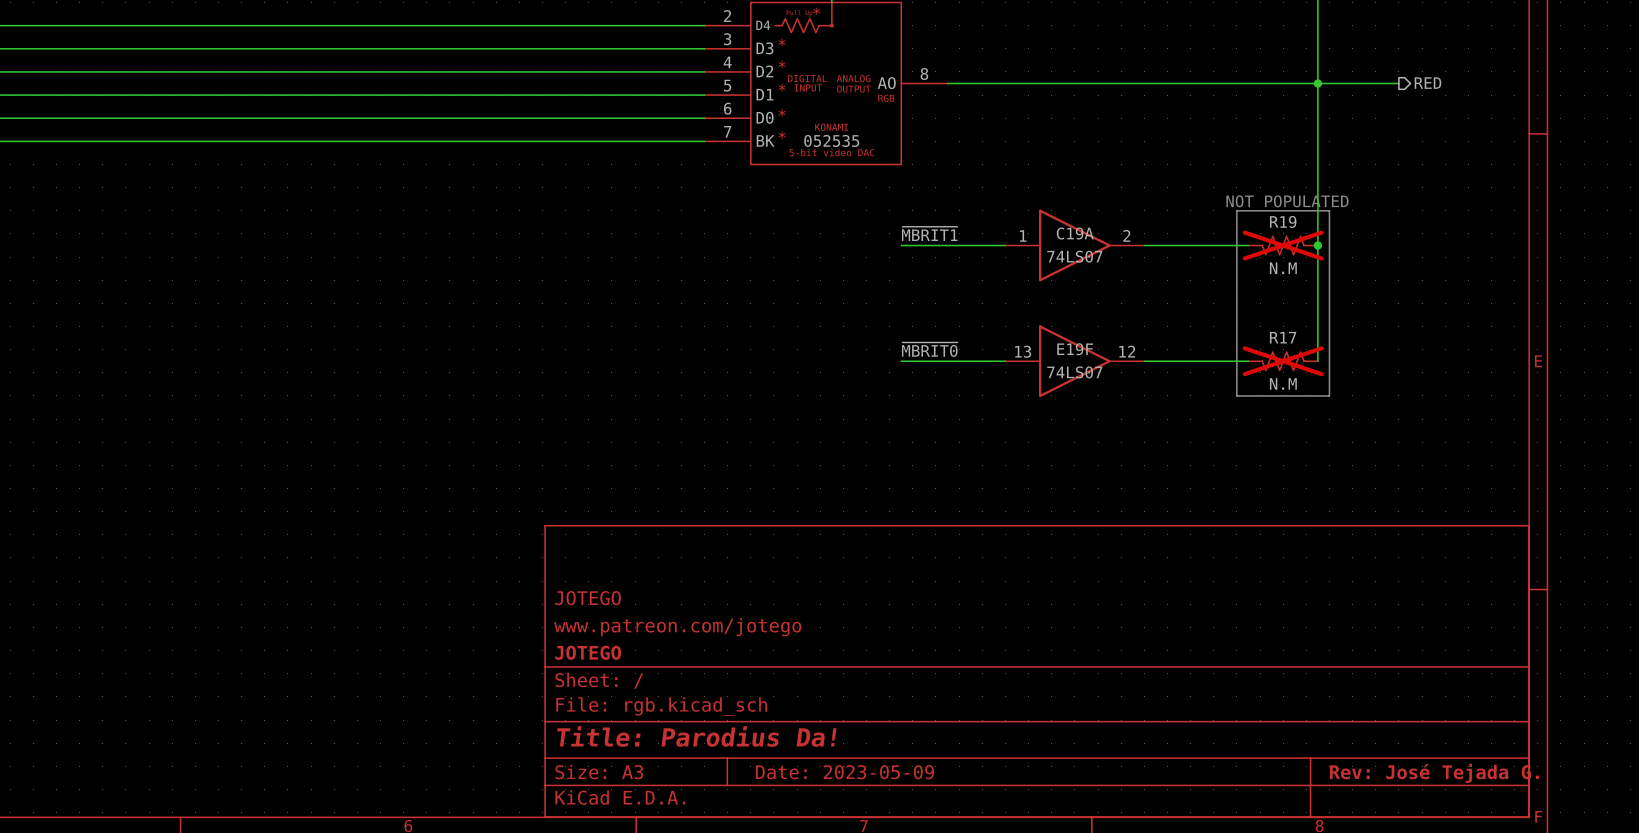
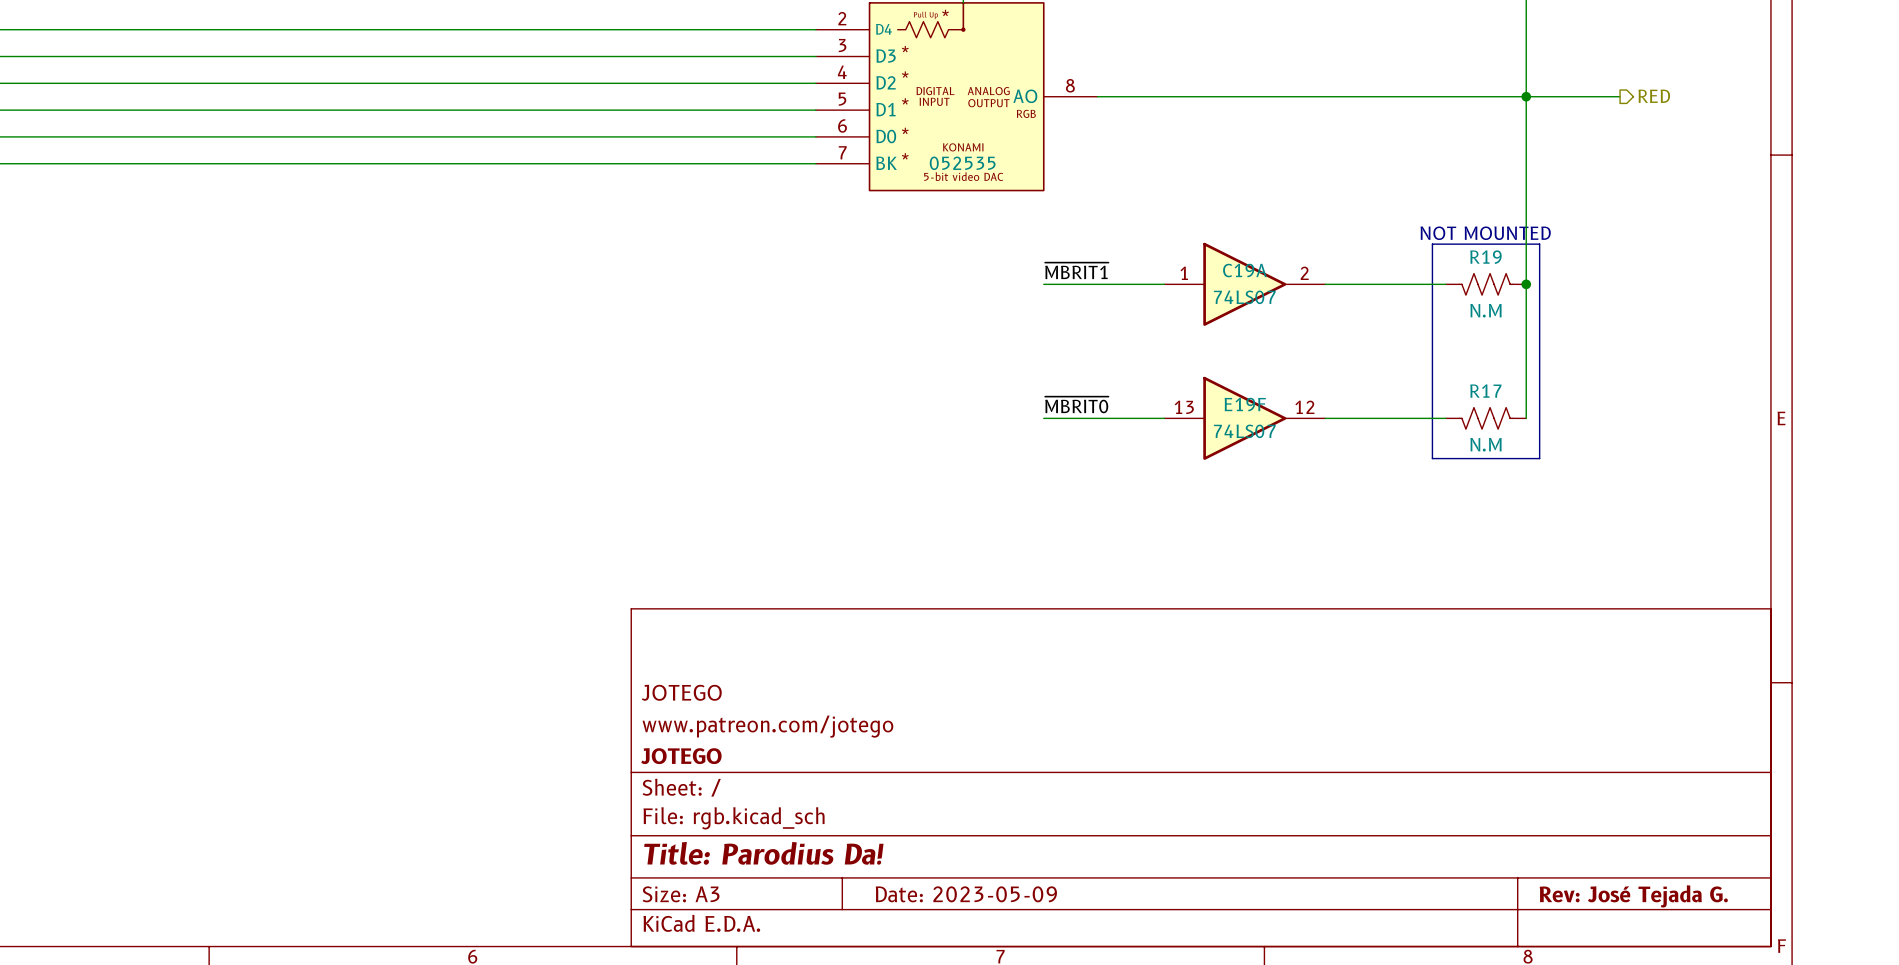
text: NOT POPULATED (1287, 201) -> NOT MOUNTED (1485, 233)
R19 do-not-place cross: (1283, 245) -> none
R17 do-not-place cross: (1283, 361) -> none

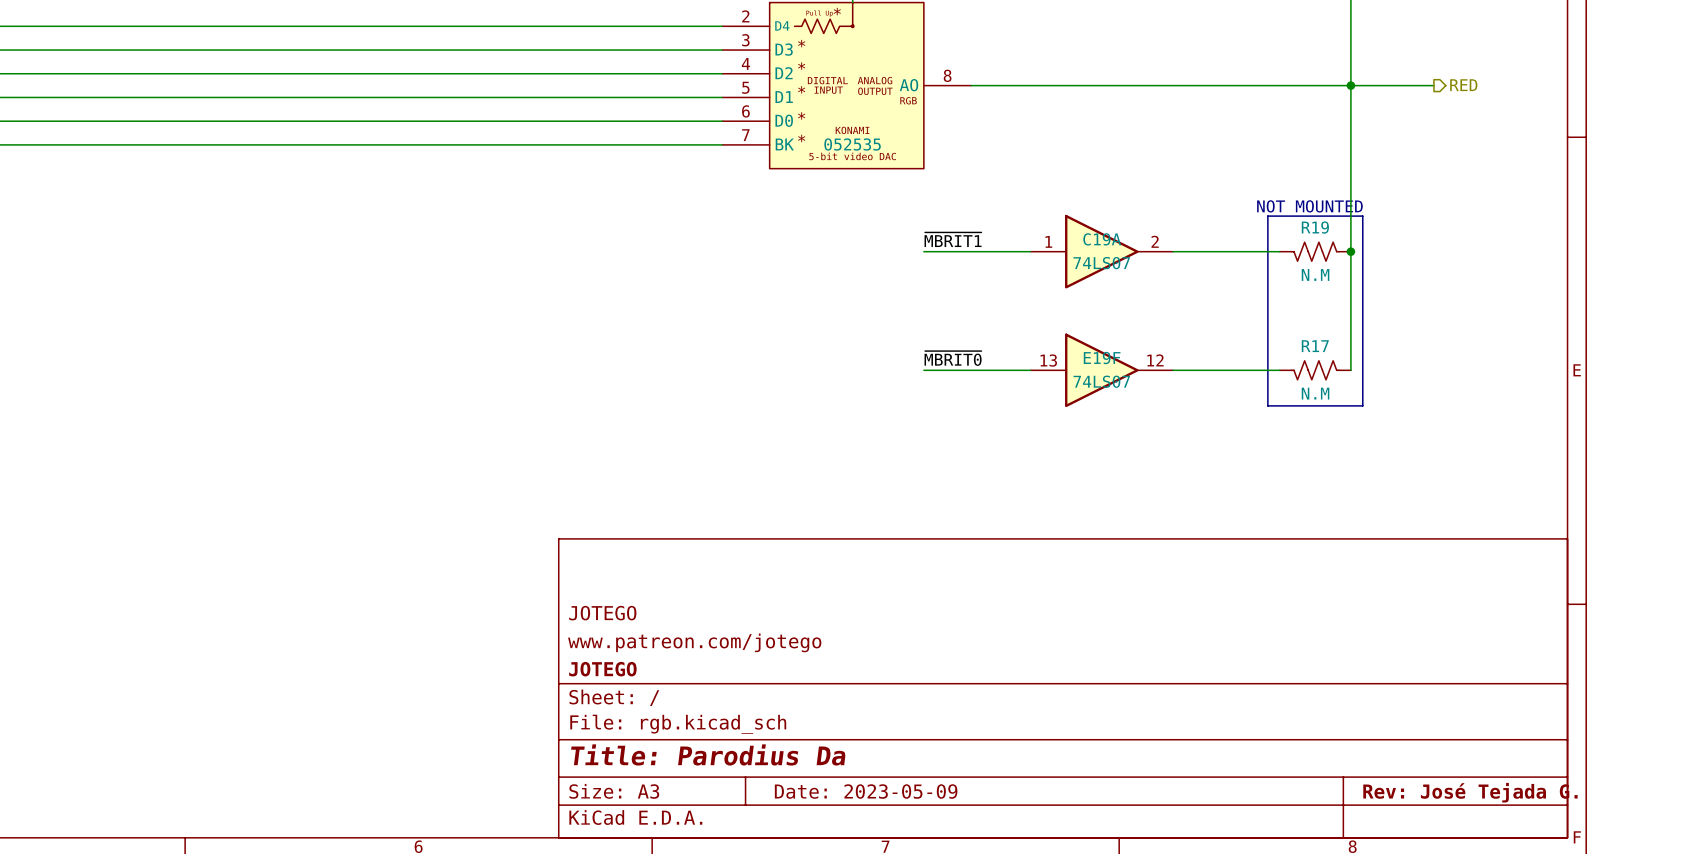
title block: Title: Parodius Da! (763, 853) -> Title: Parodius Da (708, 754)

